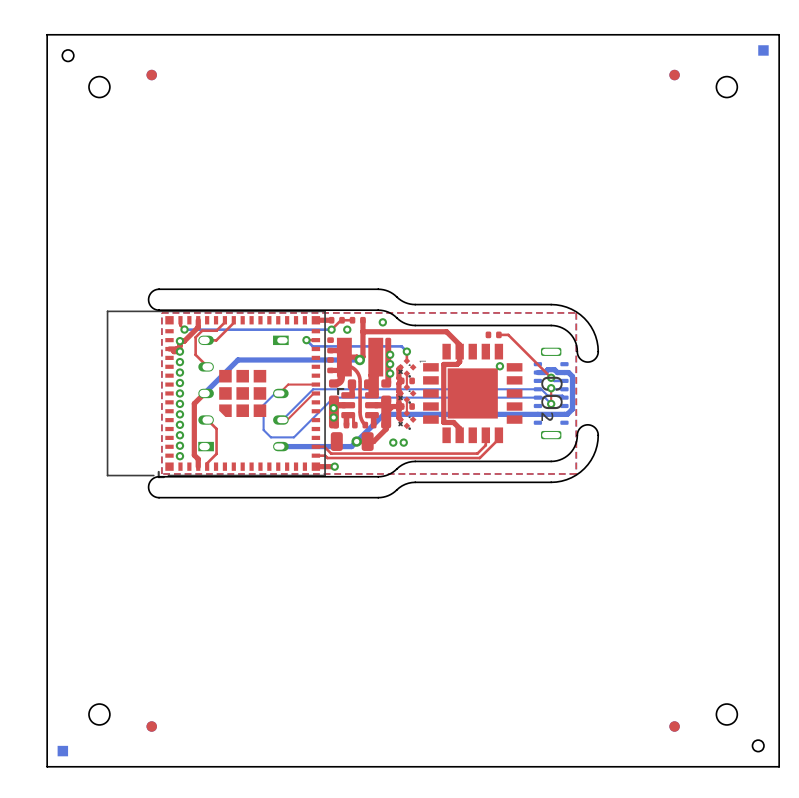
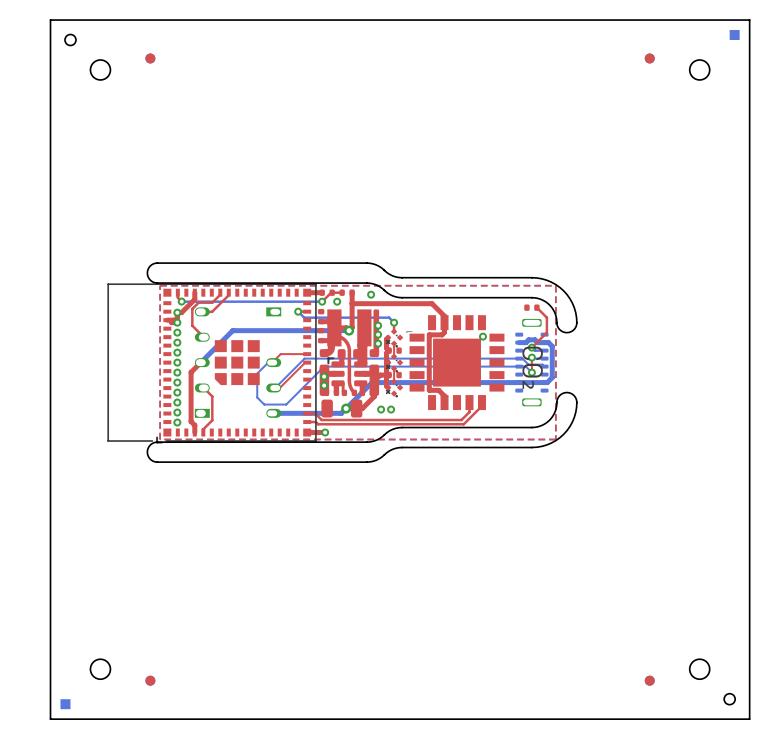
part position: (493, 334) -> (531, 307)
top track: (498, 334) (508, 334) (551, 377) -> (536, 307) (546, 317) (546, 332) (531, 347)

